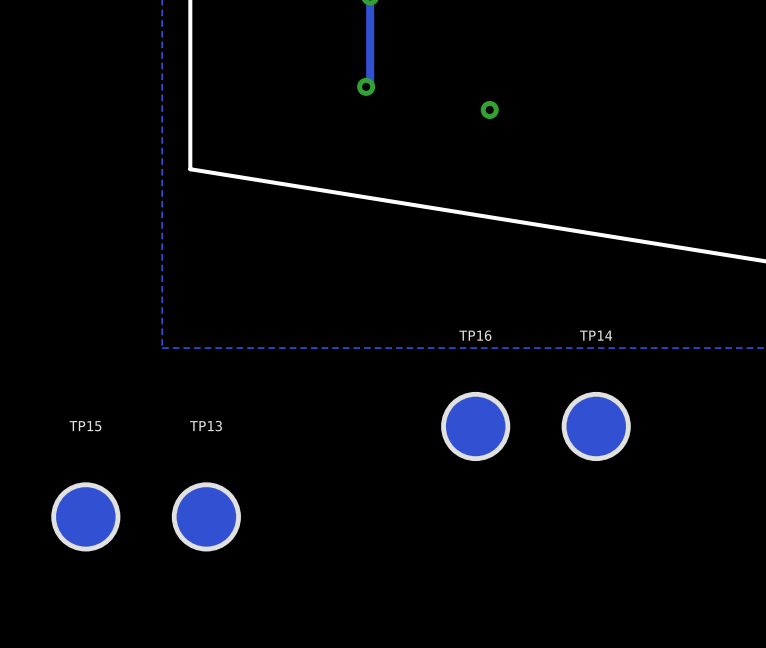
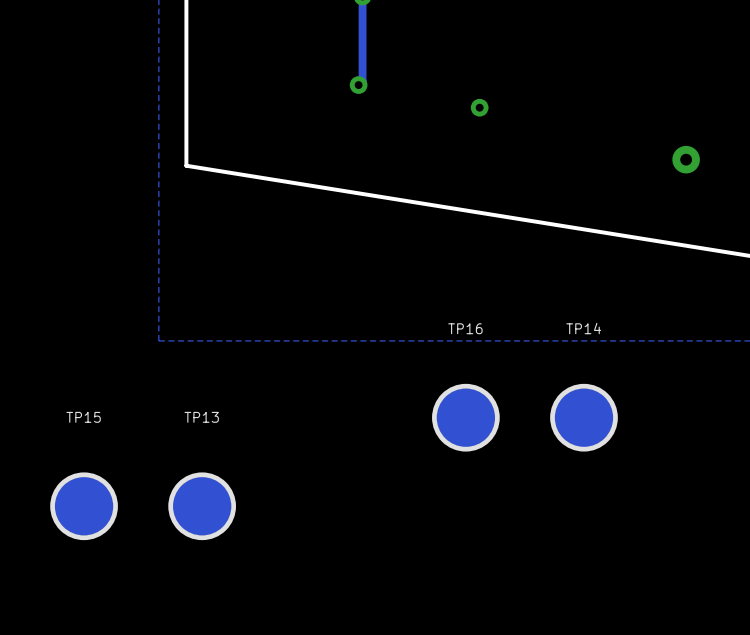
via: none -> (686, 159)

